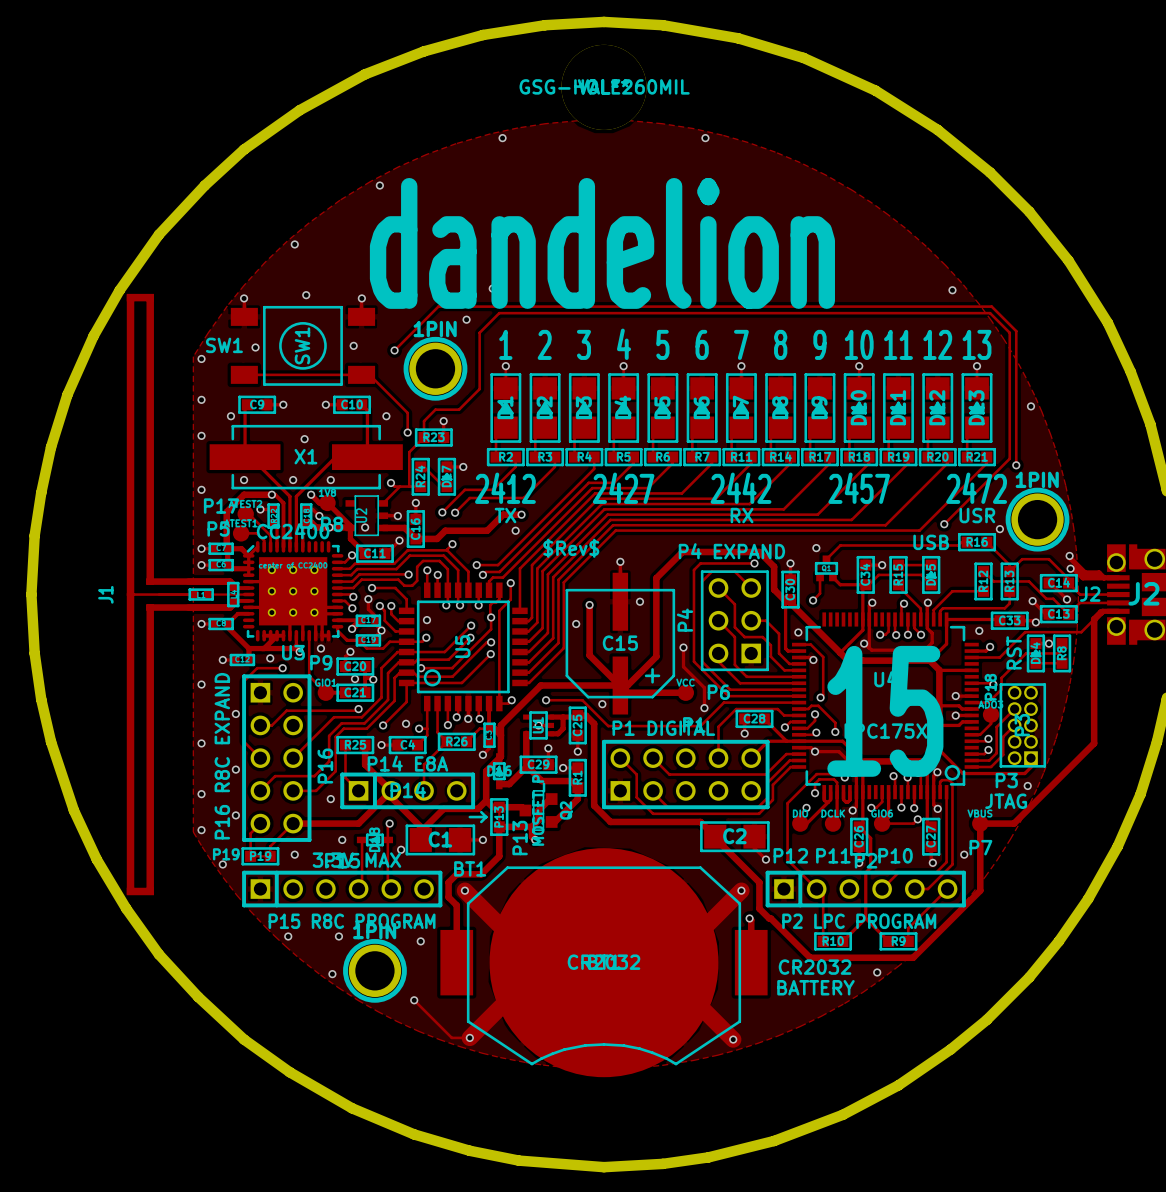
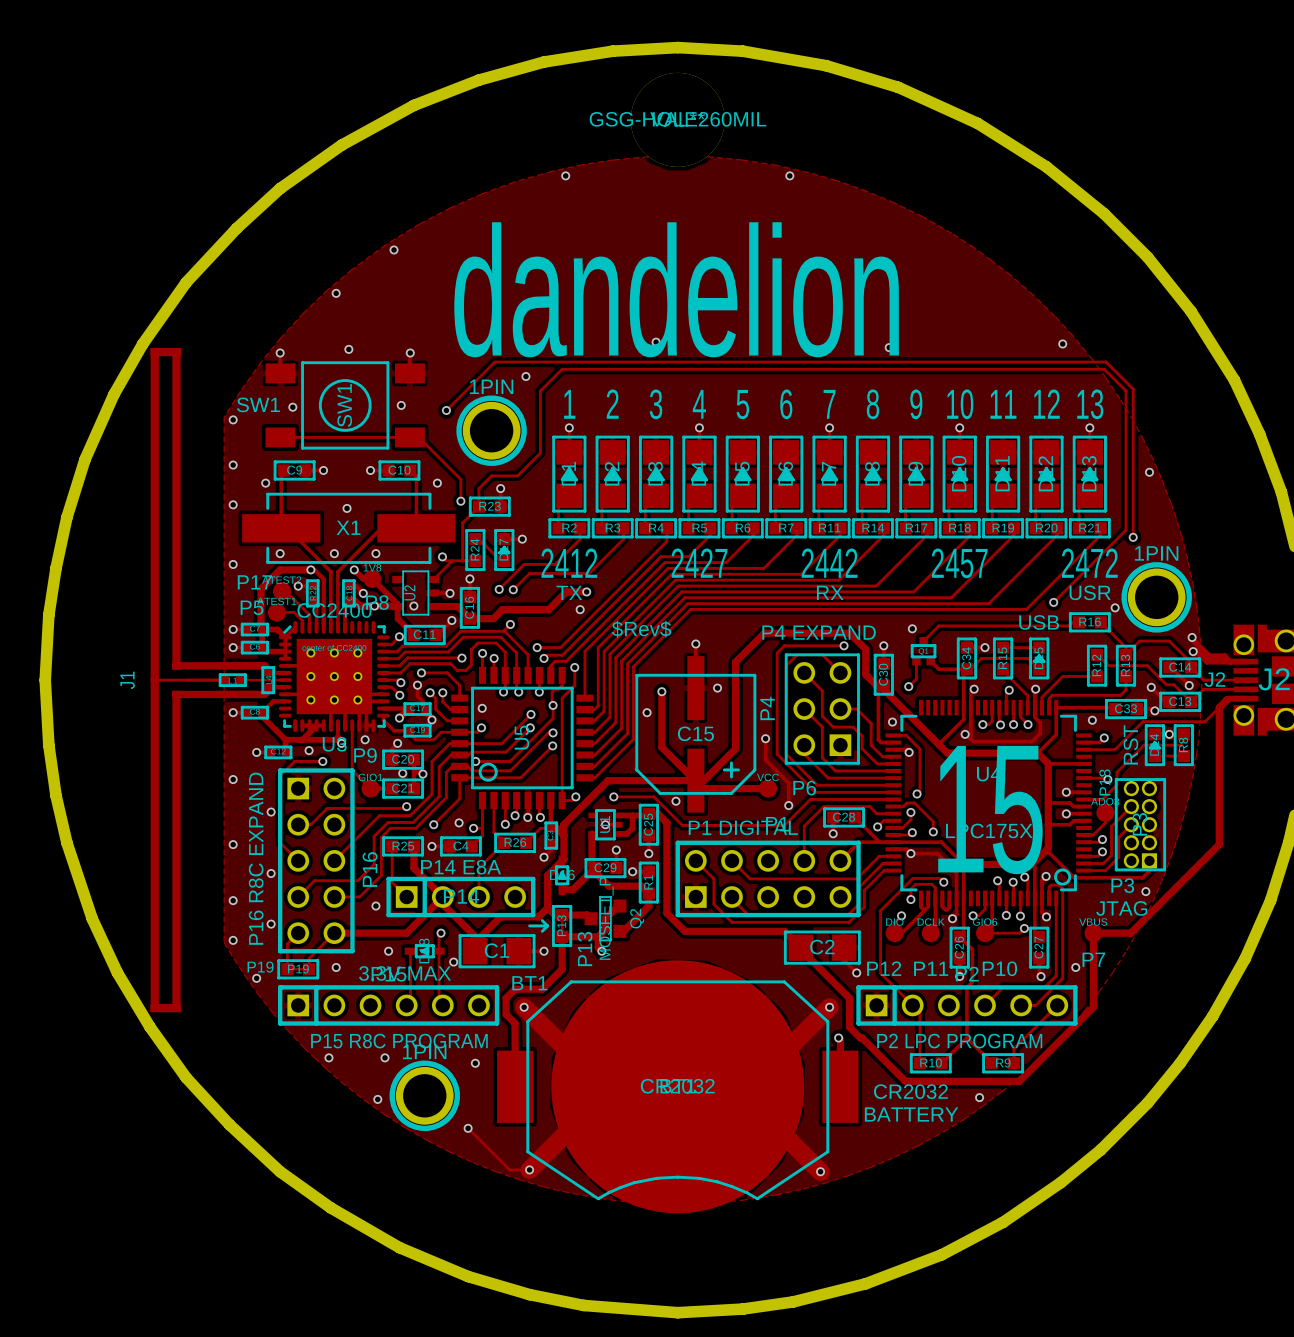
via position: (379, 185) -> (394, 249)

